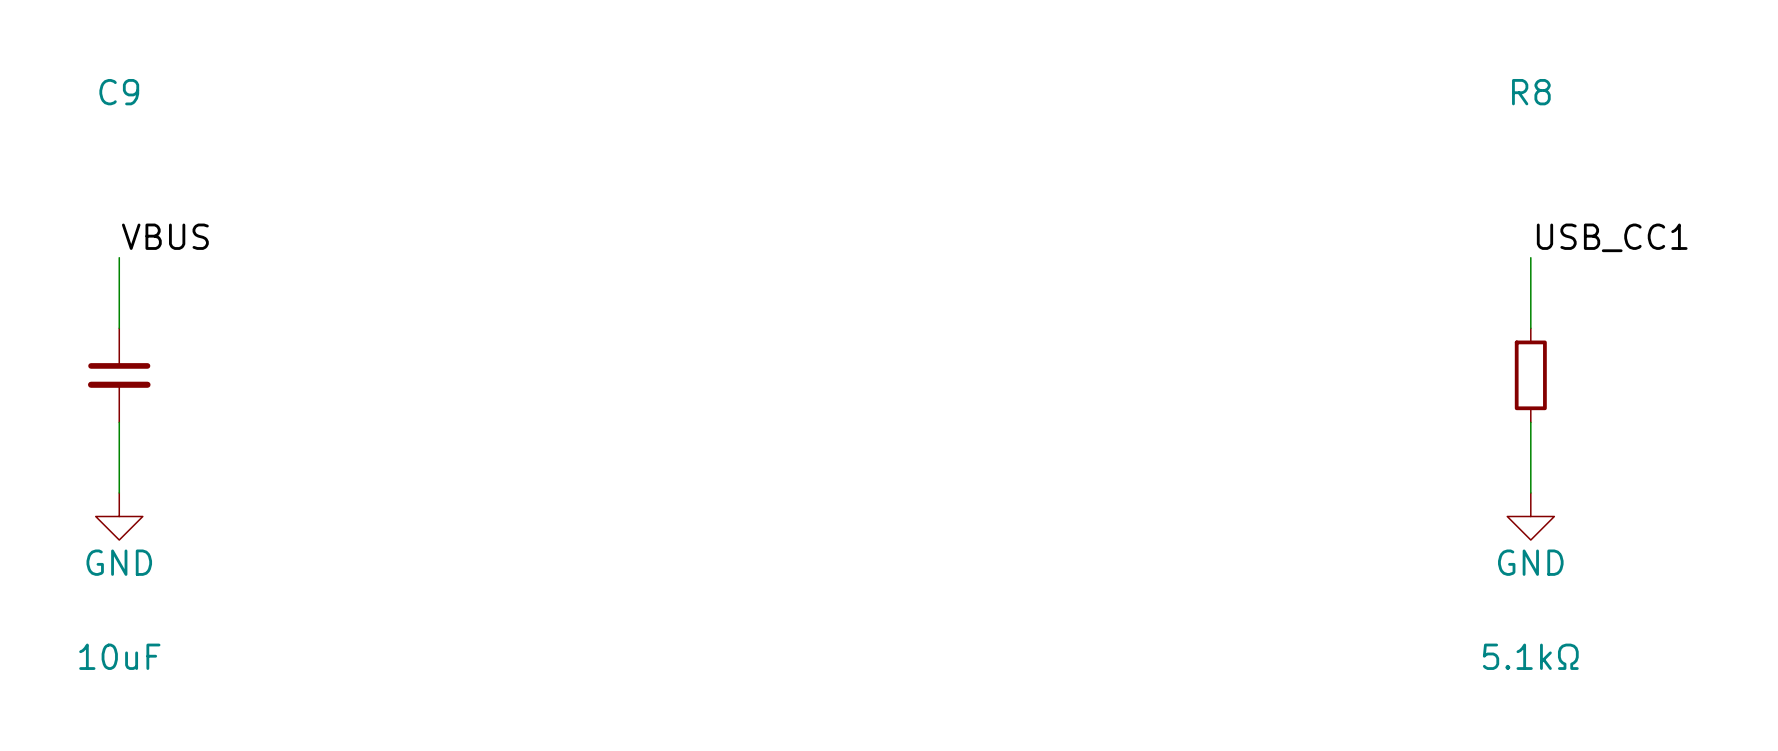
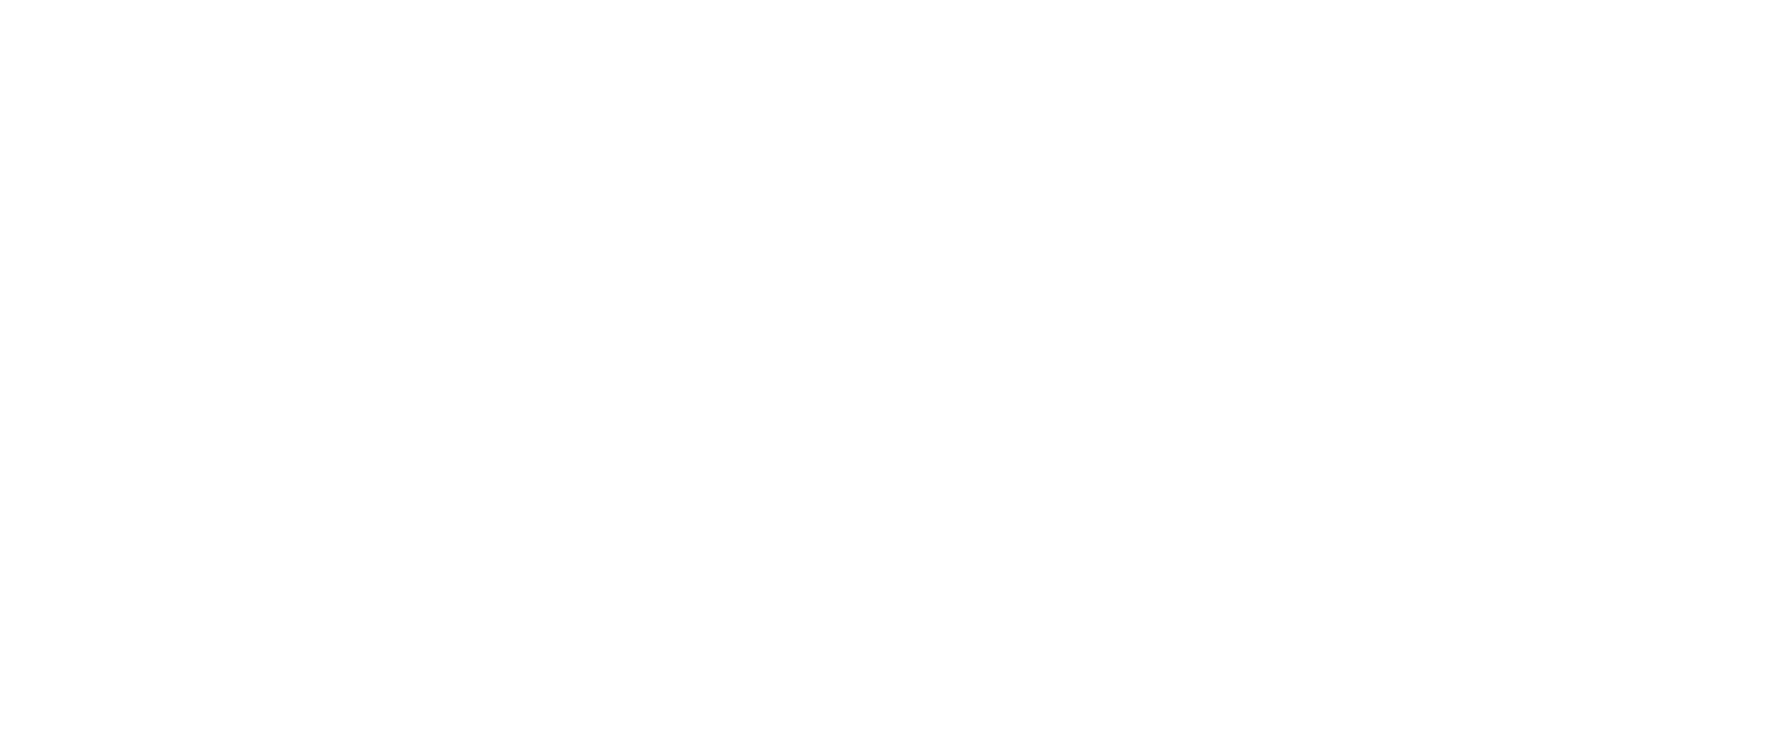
label: VBUS (165, 236) -> none
label: USB_CC1 (1612, 237) -> none
wire: (119, 257) (119, 328) -> none
wire: (1530, 257) (1530, 328) -> none
C9: 10uF (119, 375) -> none
R8: 5.1kΩ (1530, 375) -> none
wire: (119, 422) (119, 492) -> none
wire: (1530, 422) (1530, 492) -> none
power symbol: GND (119, 516) -> none
power symbol: GND (1530, 516) -> none

